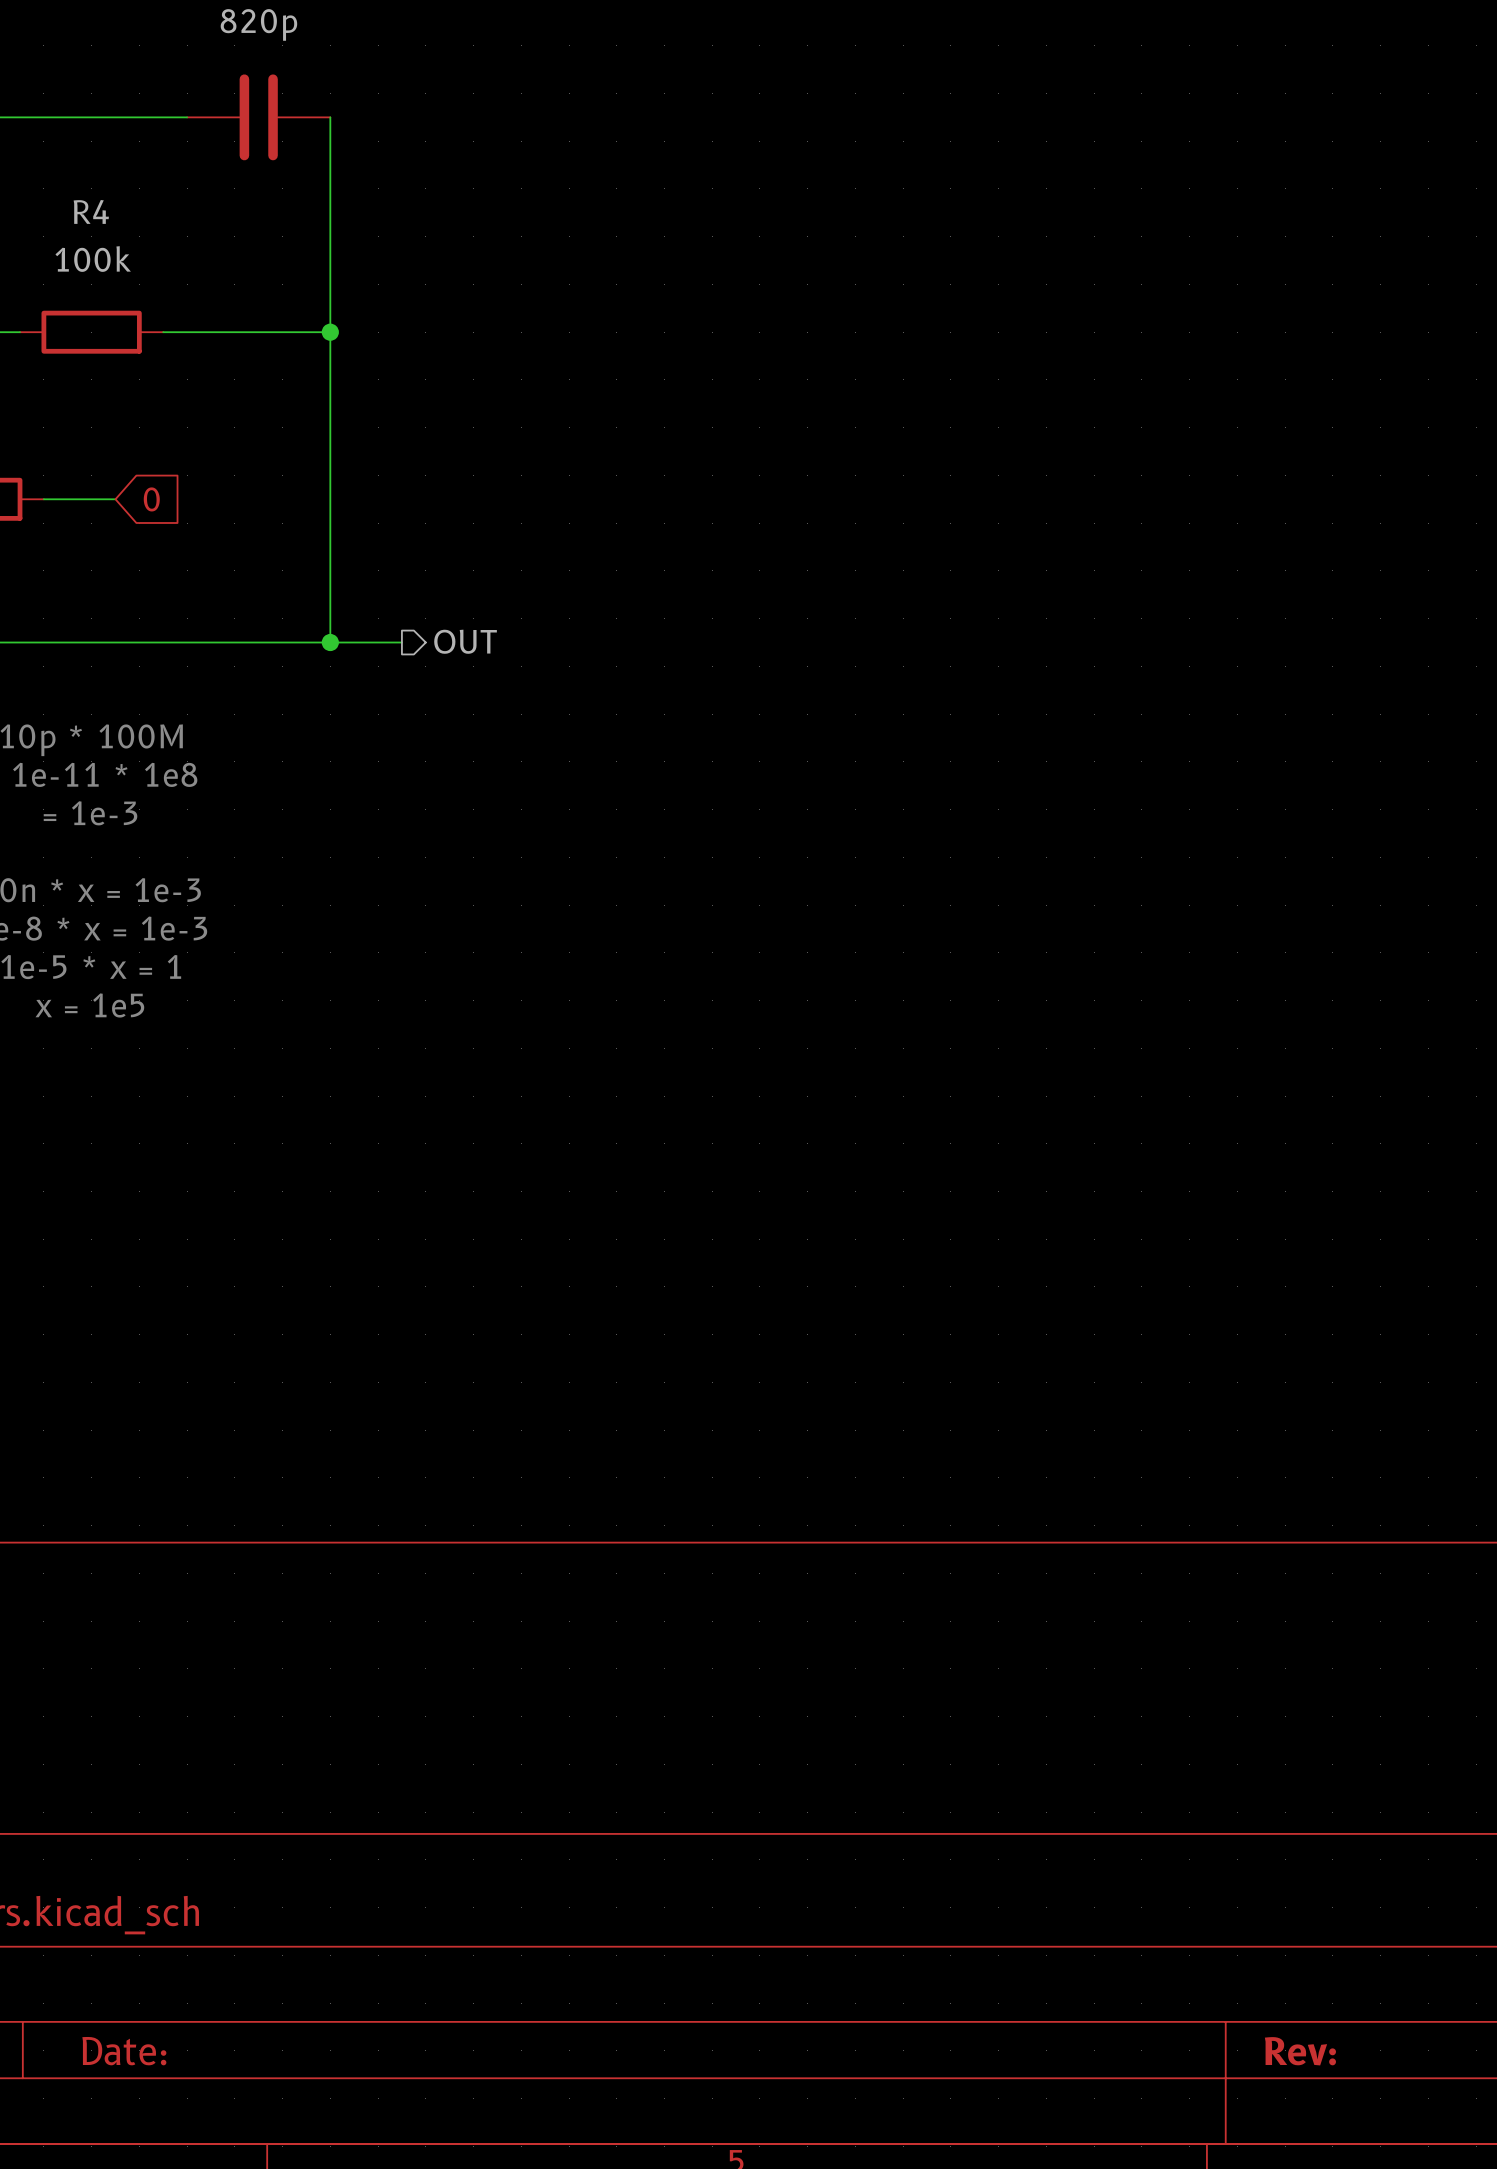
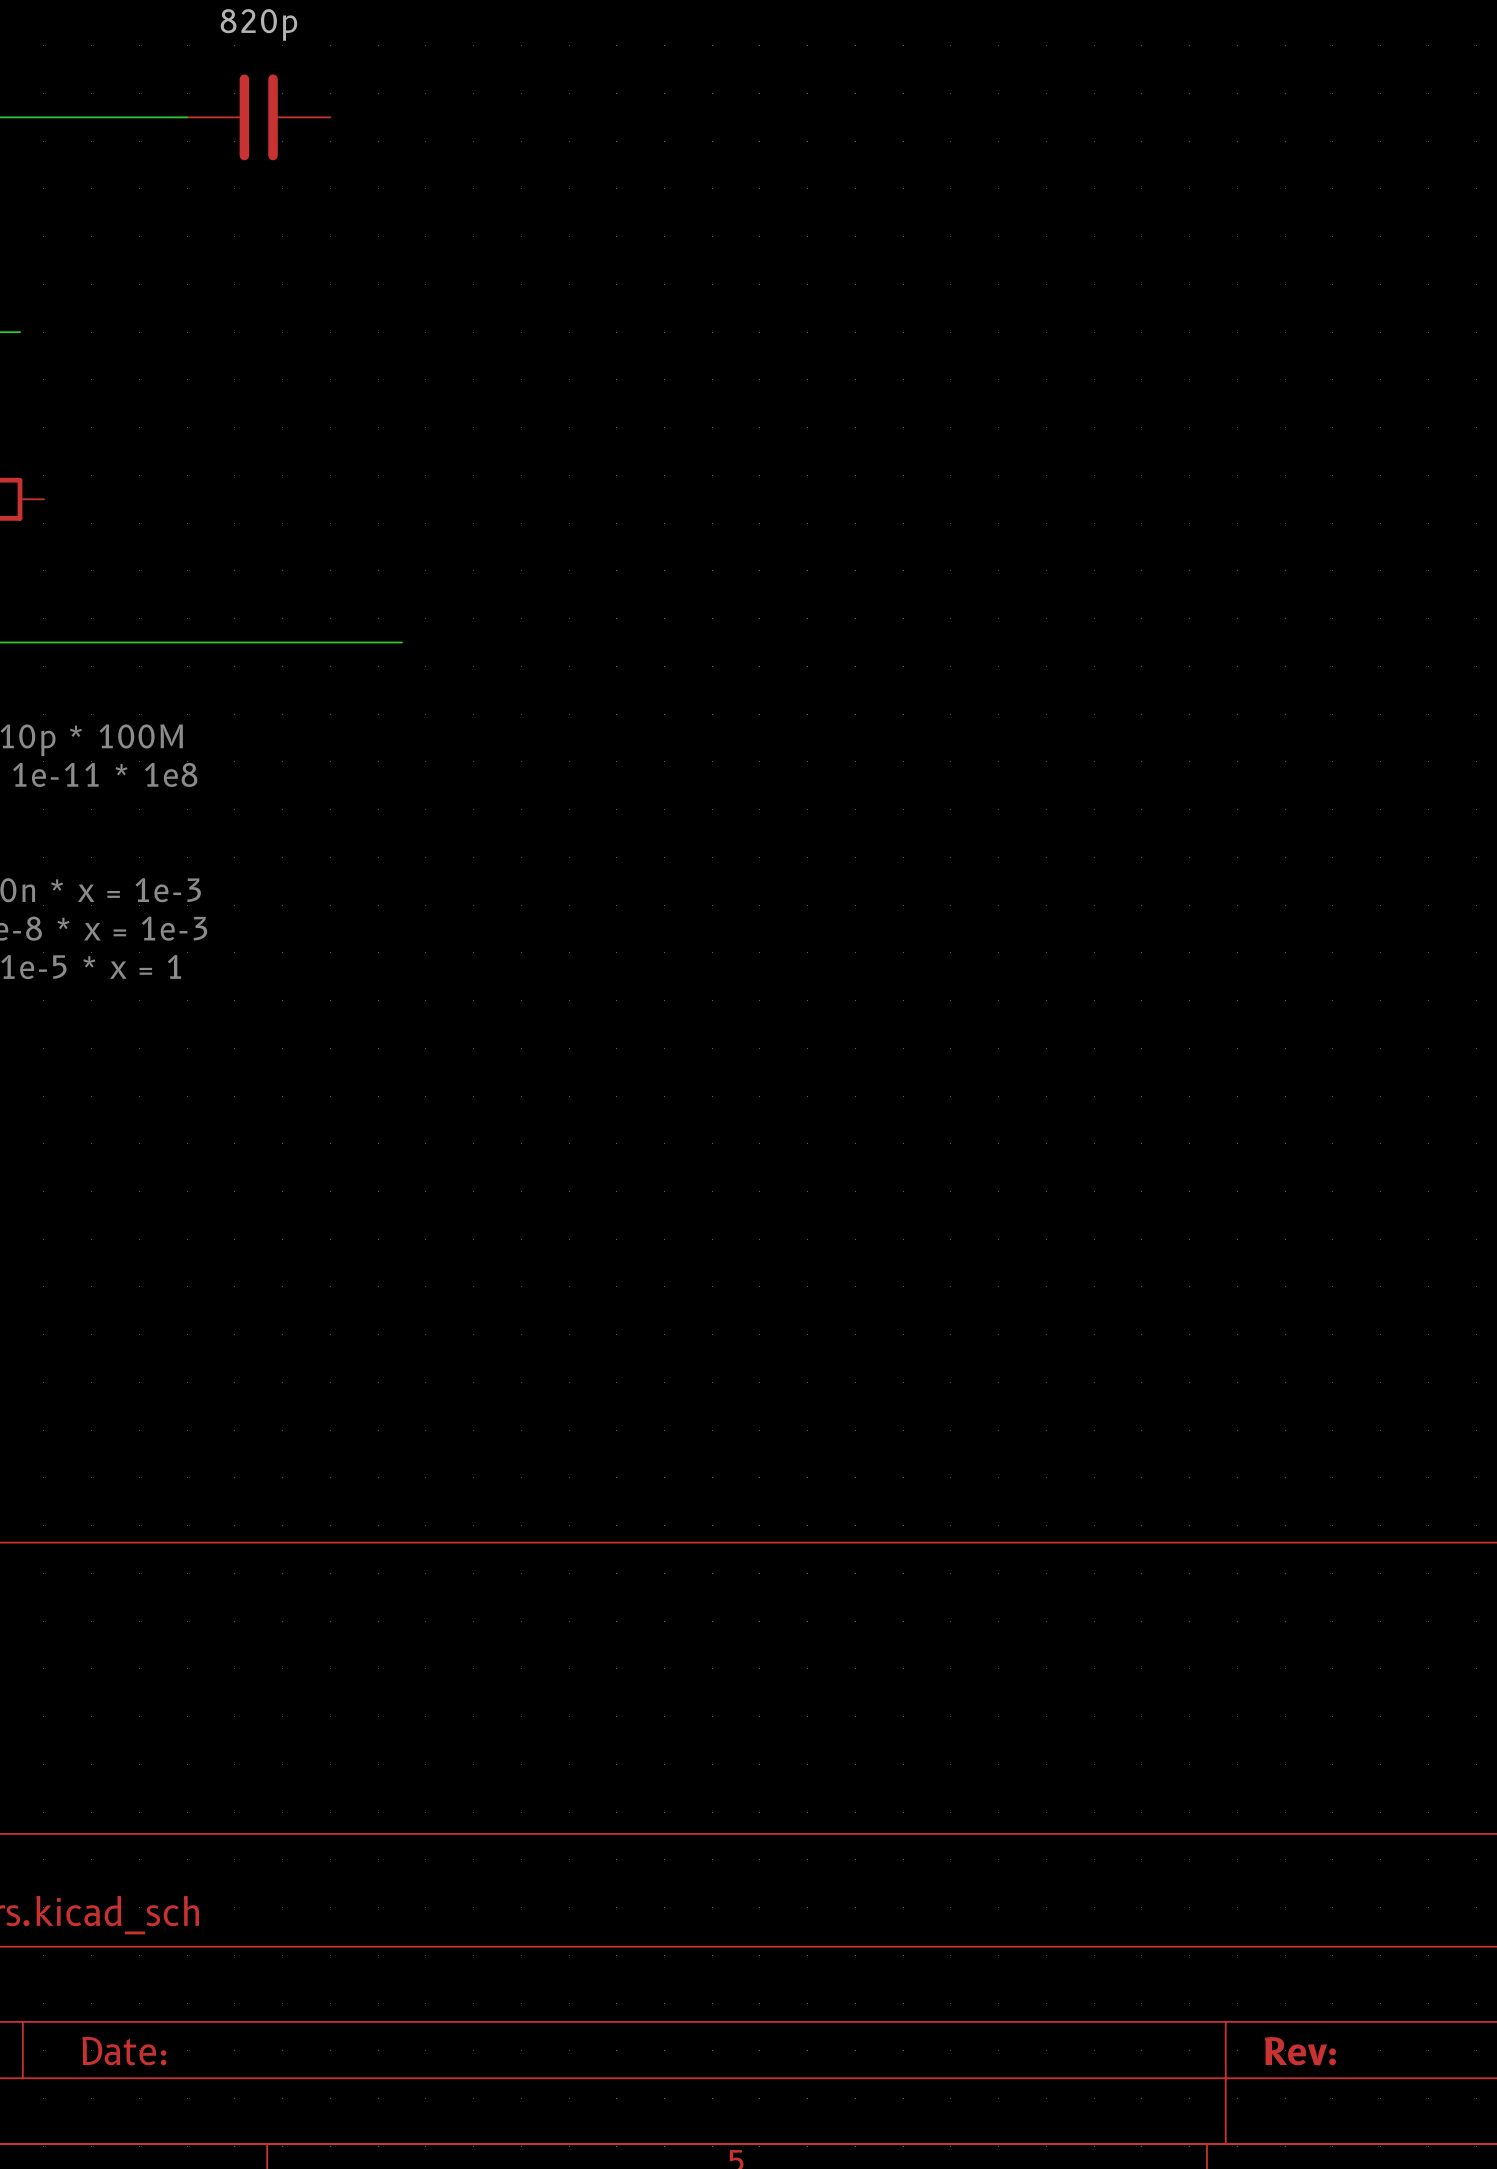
wire: (330, 117) (330, 642) -> none
R4: 100k (91, 332) -> none
wire: (163, 332) (330, 332) -> none
junction: (330, 332) -> none
wire: (43, 499) (115, 499) -> none
global label: 0 (151, 499) -> none
hierarchical label: OUT (465, 641) -> none
junction: (330, 642) -> none
text: = 1e-3 (90, 813) -> none
text: x = 1e5 (89, 1005) -> none

